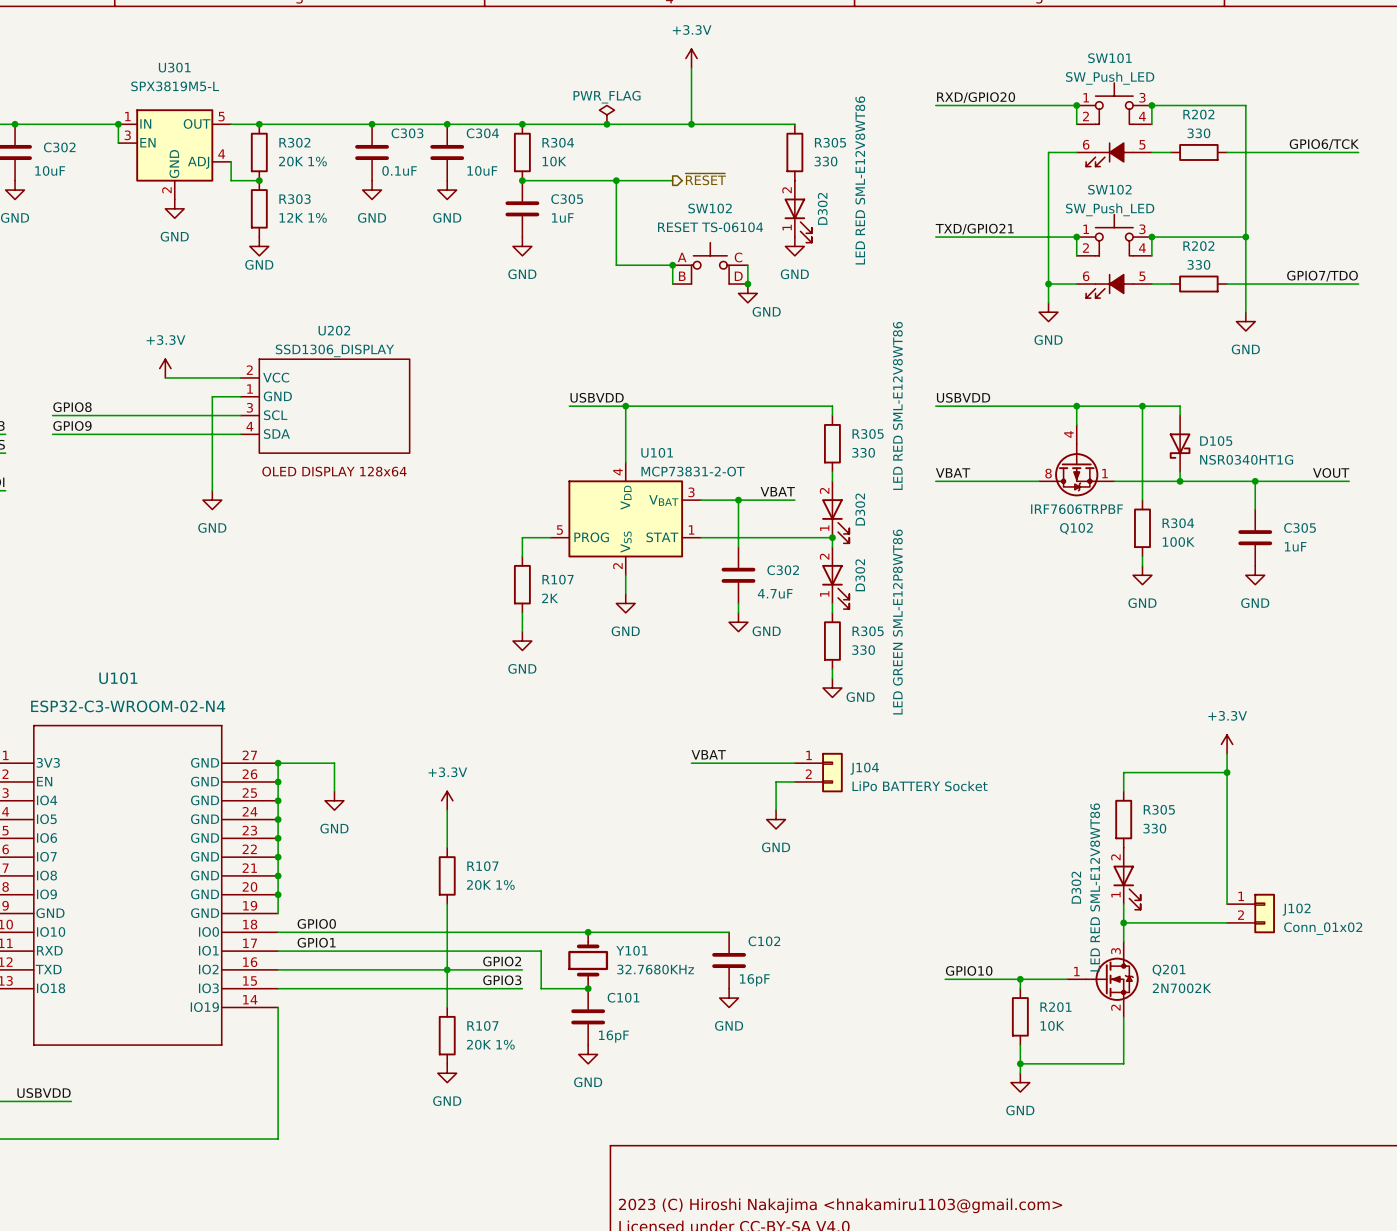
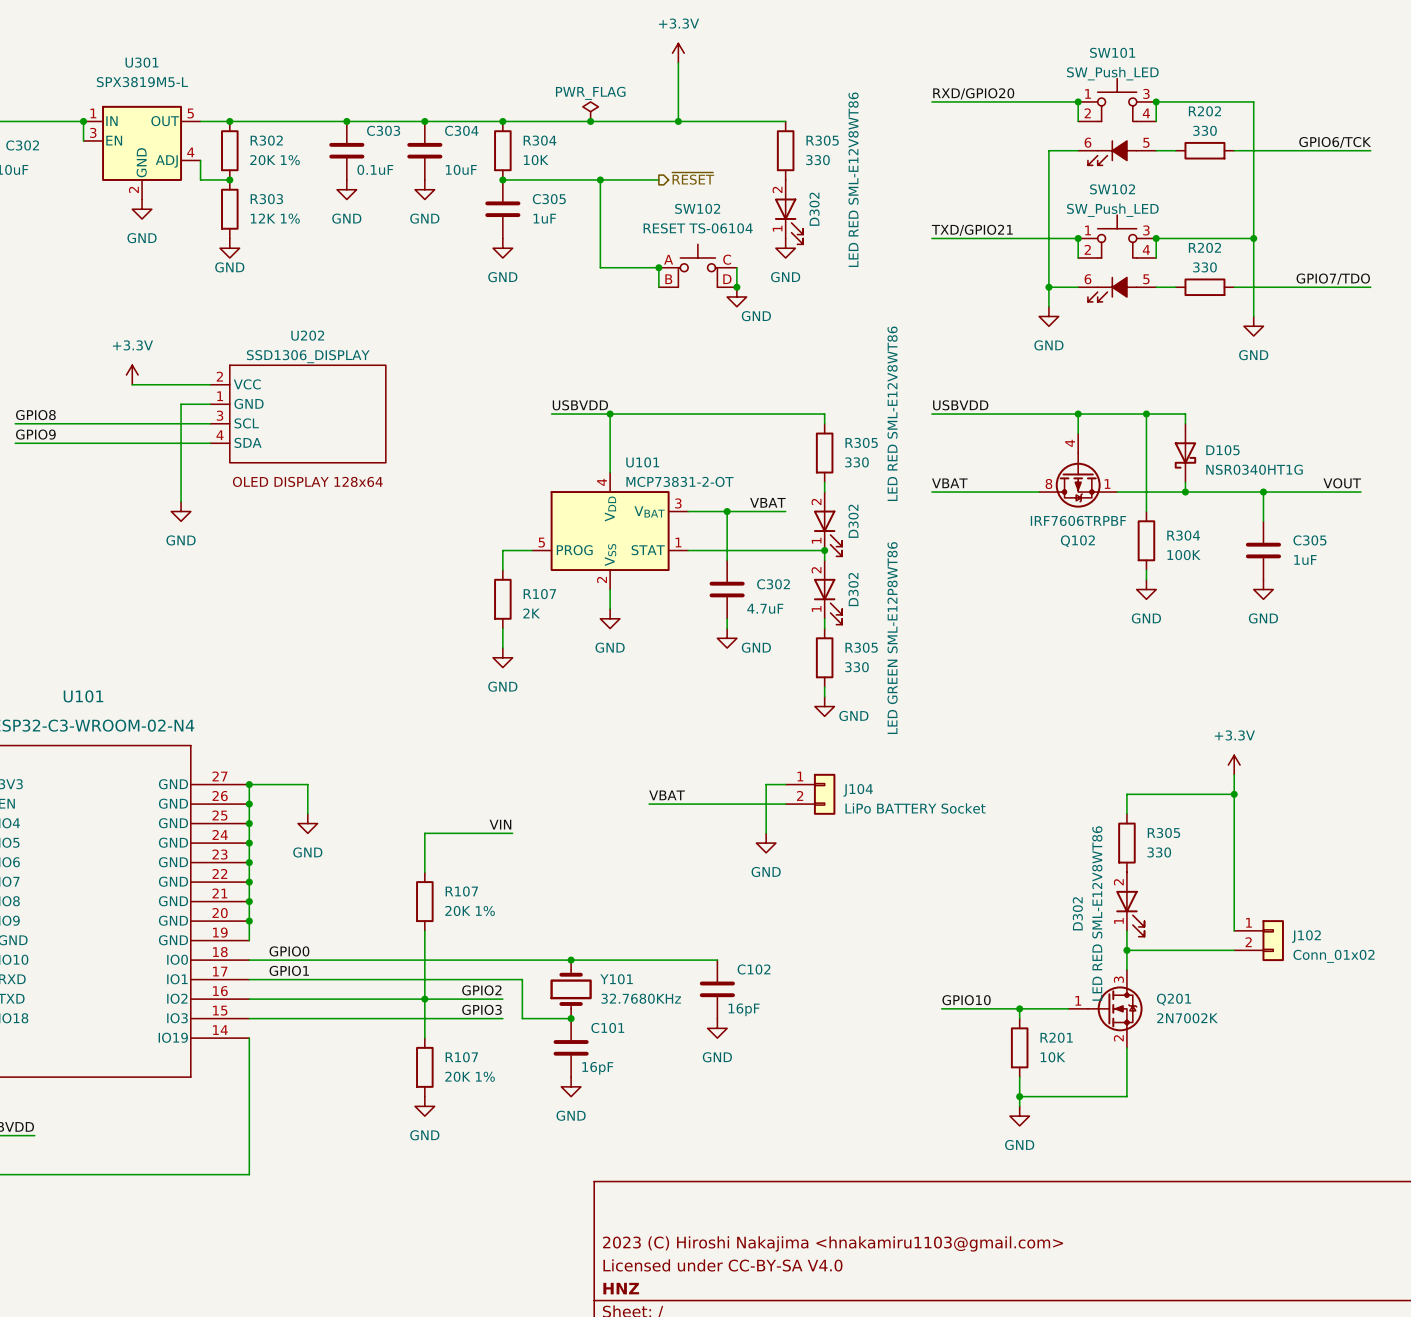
label position: VBAT (708, 754) -> VBAT (667, 795)
wire: (691, 763) (776, 763) -> (649, 804) (766, 804) (766, 784)
power symbol: +3.3V (447, 800) -> none
label: none -> VIN (500, 824)
wire: none -> (424, 833) (512, 833)

